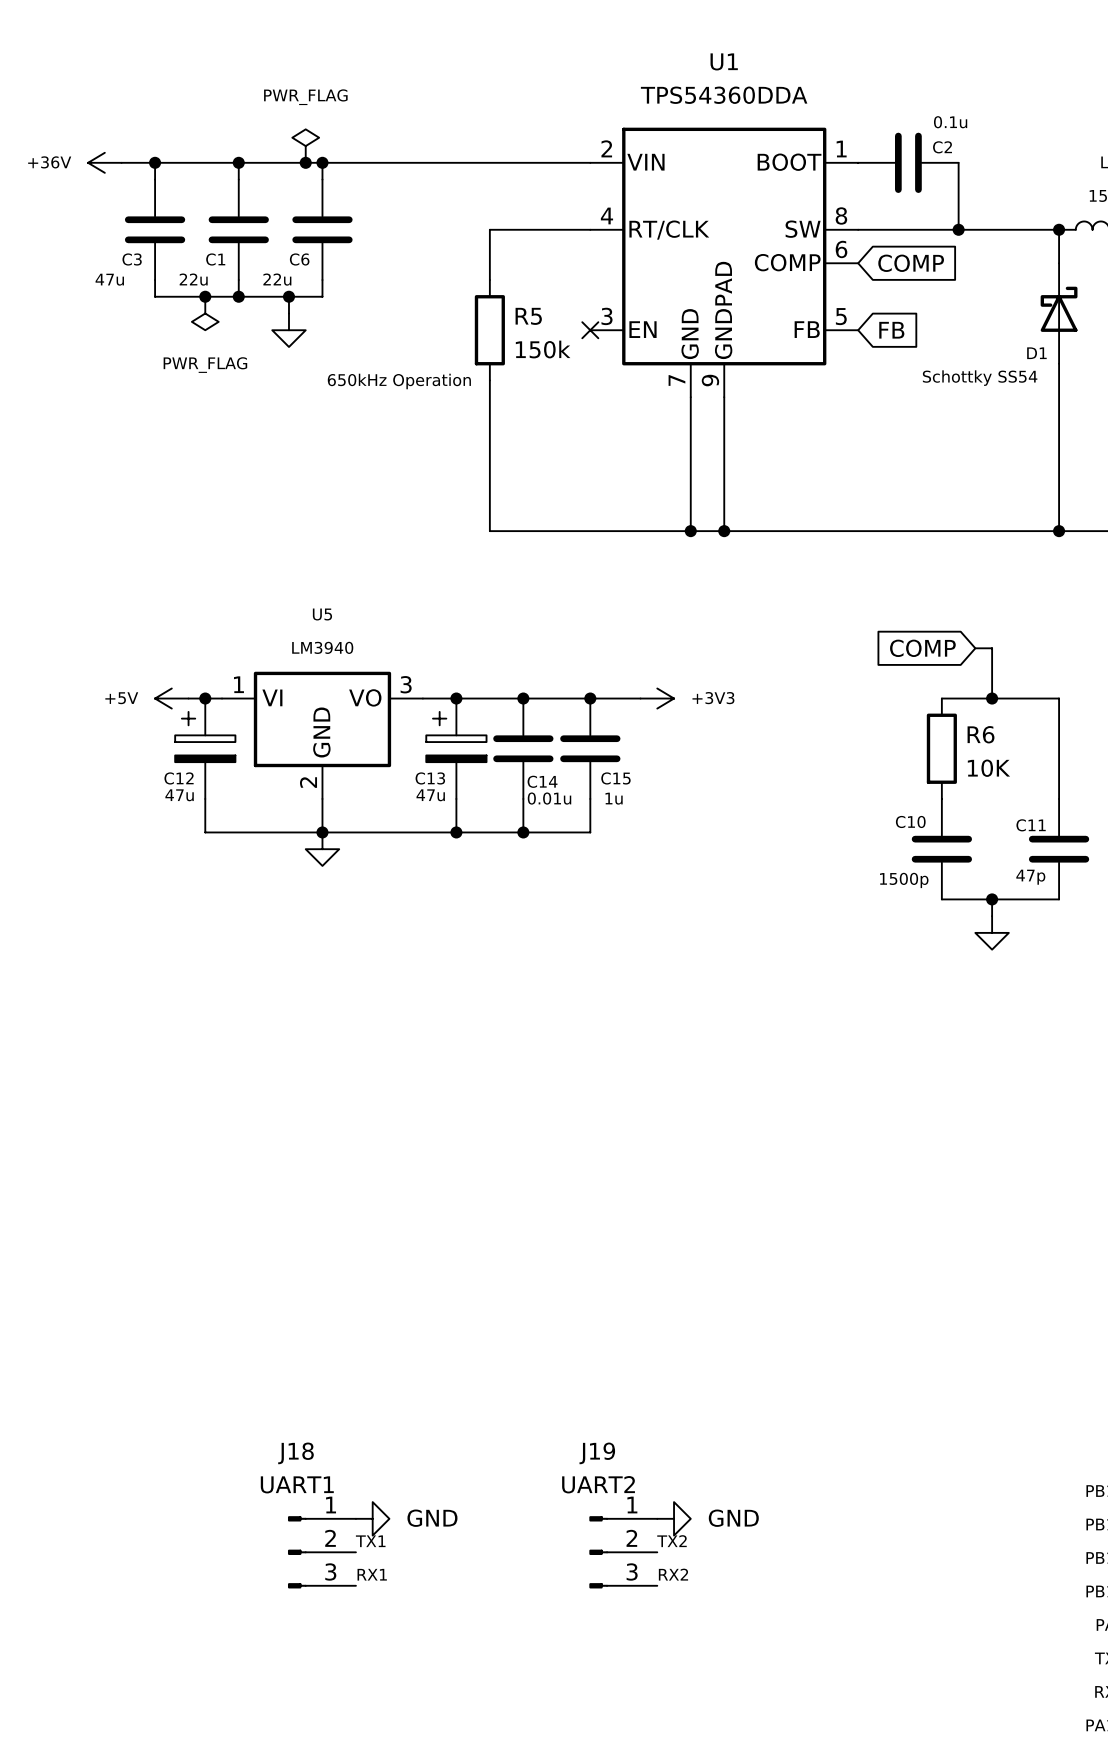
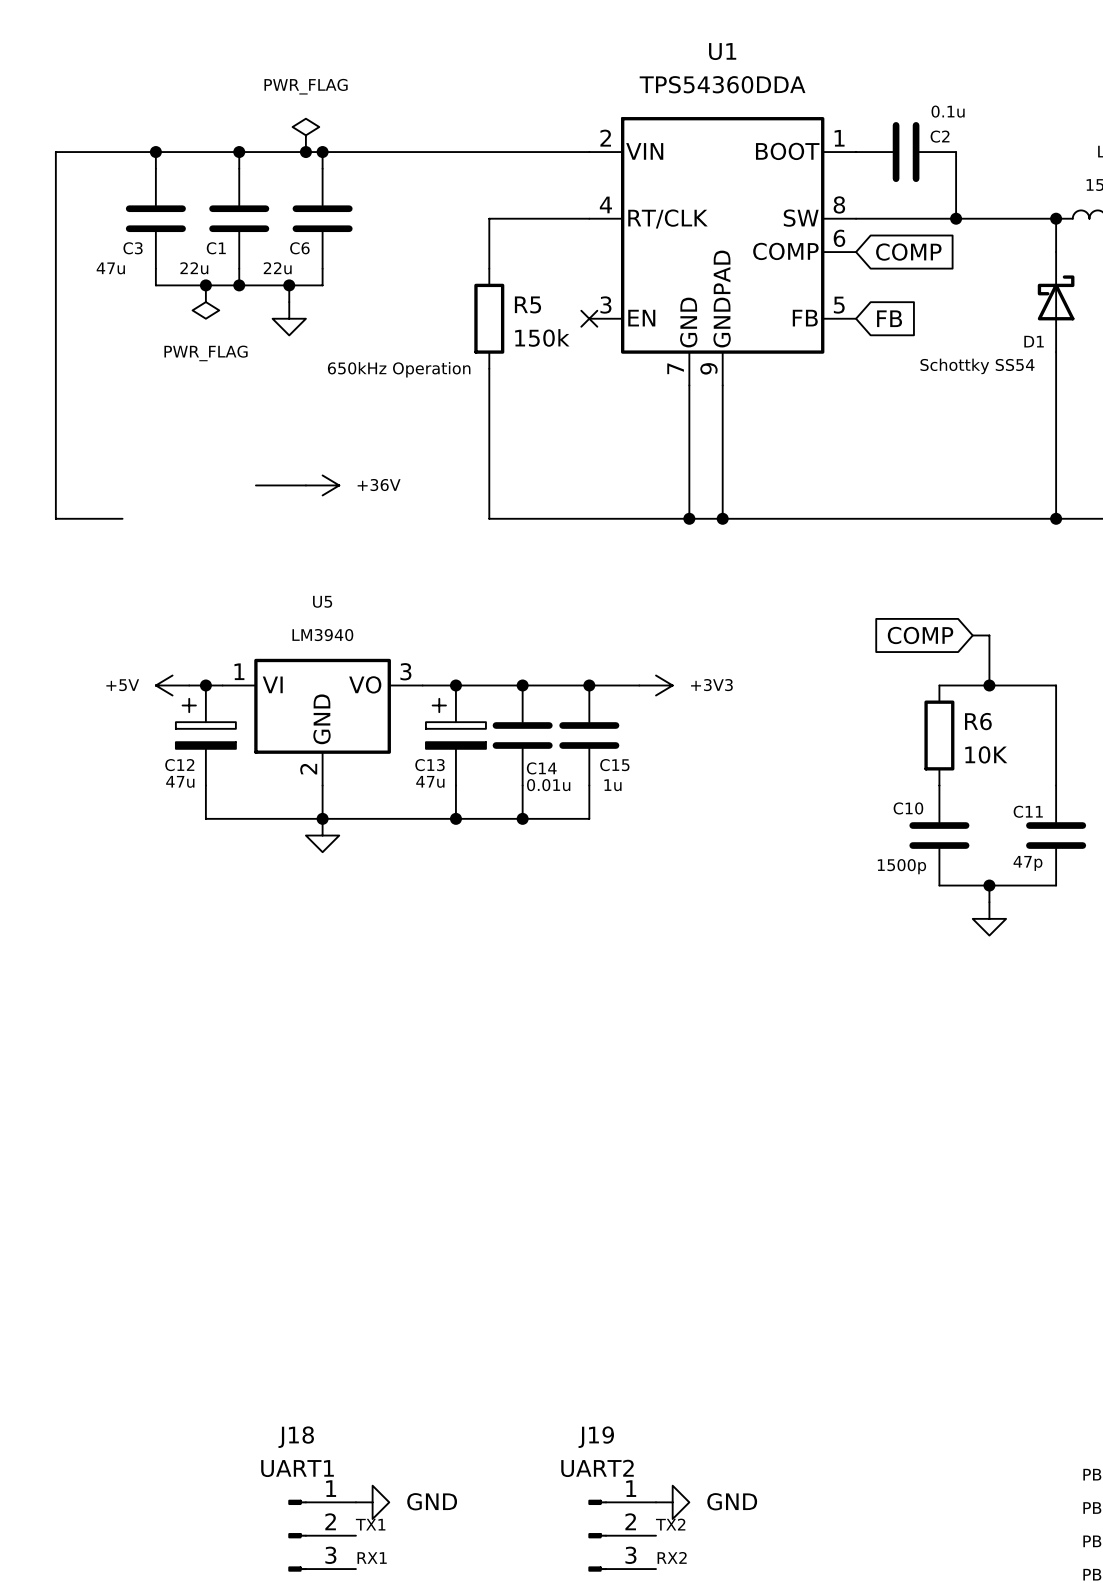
power symbol: +36V (104, 162) -> none
wire: none -> (122, 152) (55, 152) (55, 518) (122, 518)
wire: none -> (255, 485) (305, 485)
power symbol: none -> +36V (322, 485)

